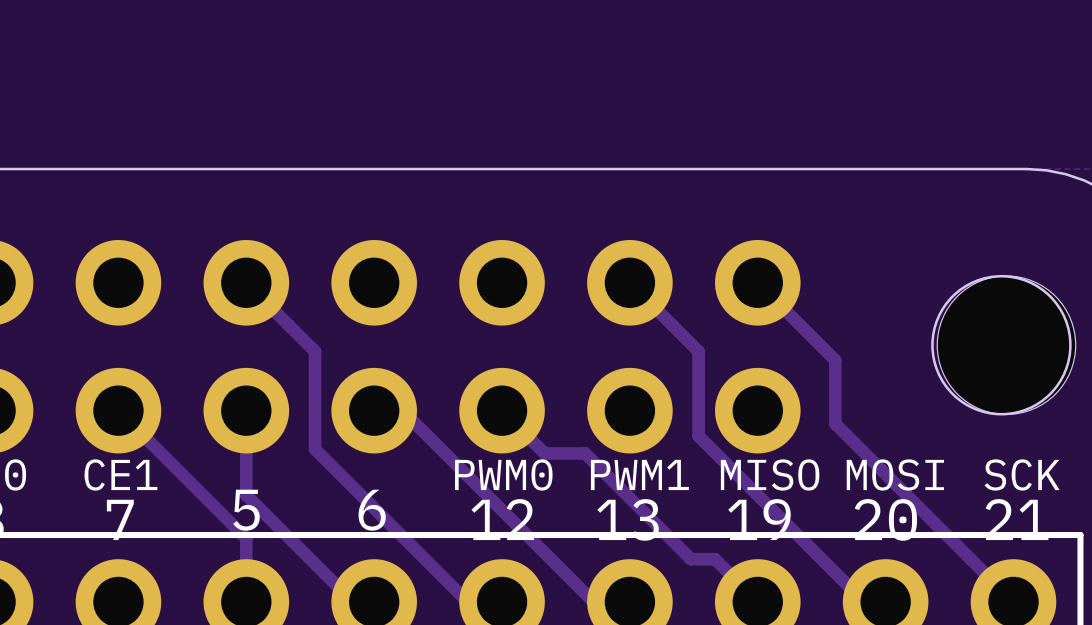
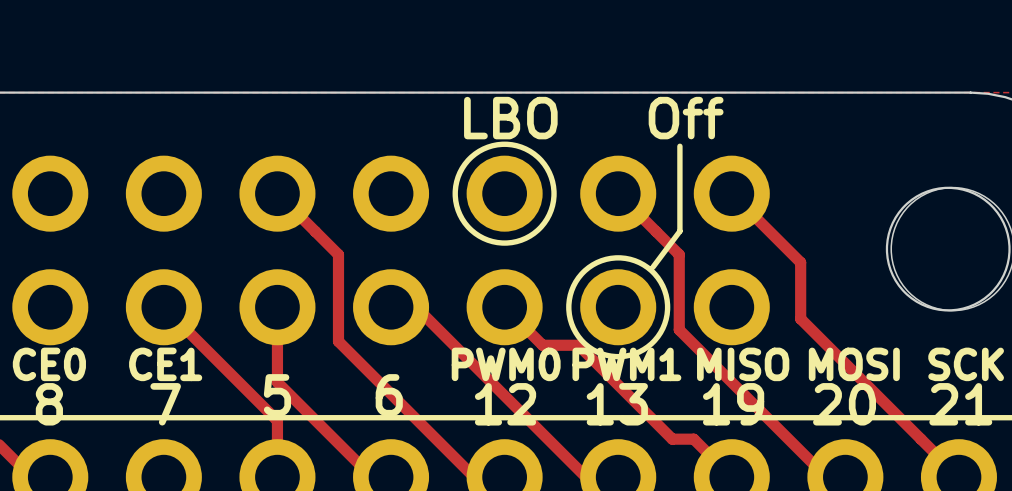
text: none -> Off (686, 118)
text: none -> LBO (510, 118)
drawing: none -> [452, 141, 671, 360]
line: none -> (679, 146) (679, 231) (653, 267)

